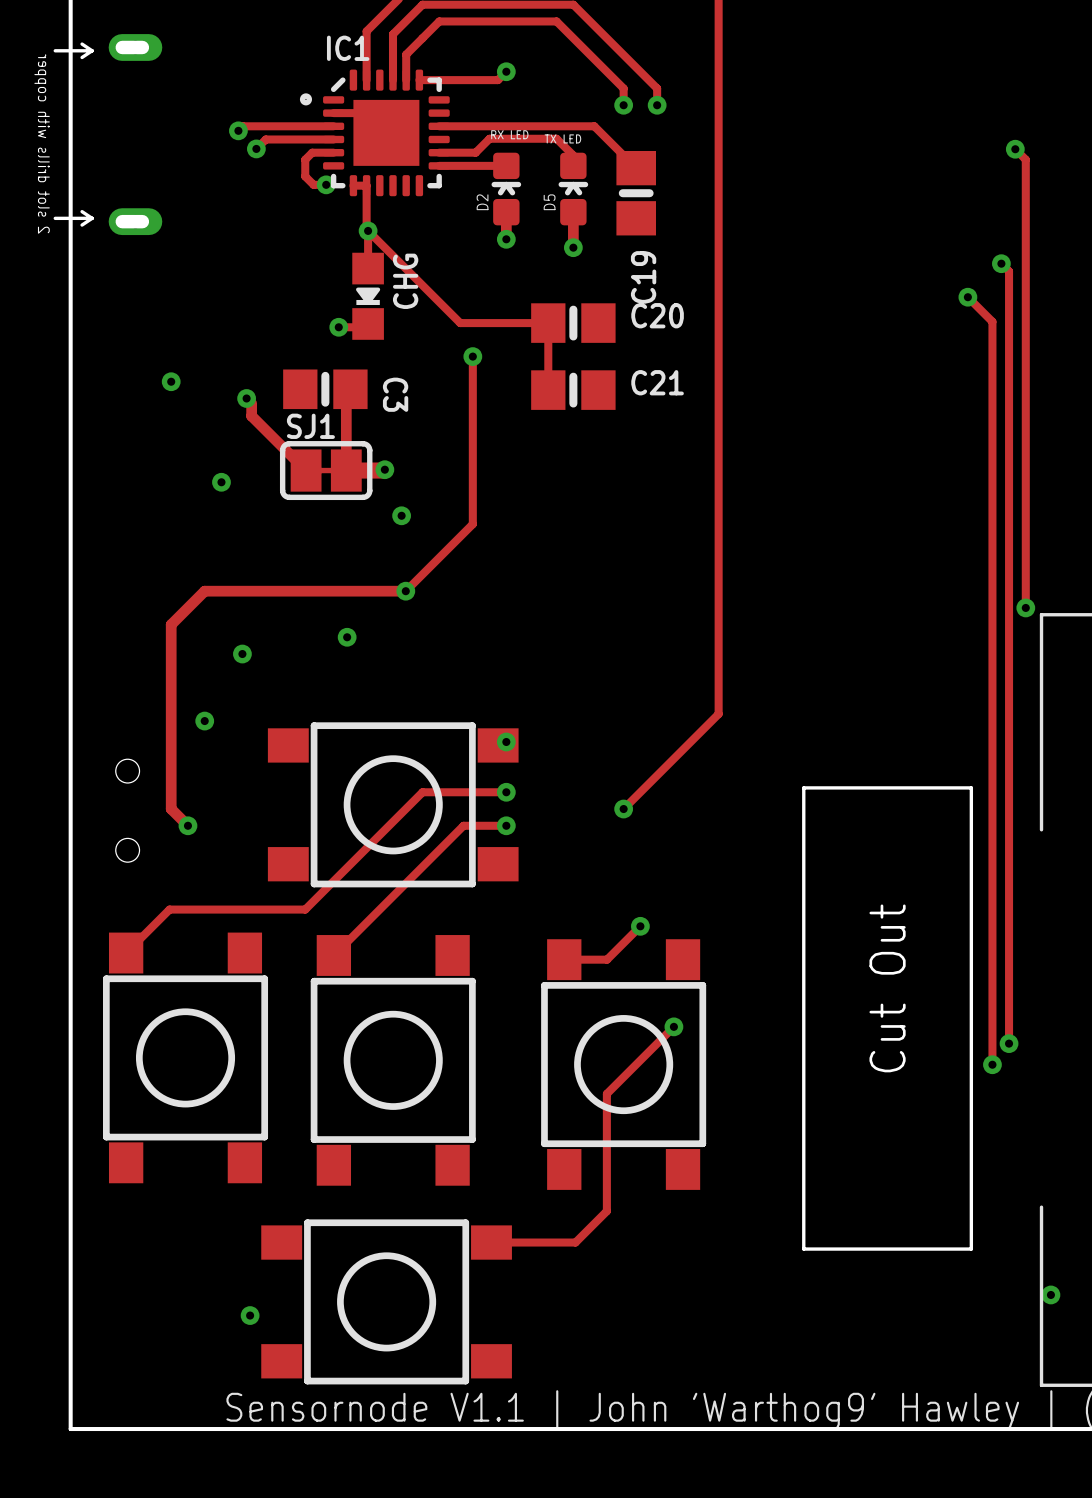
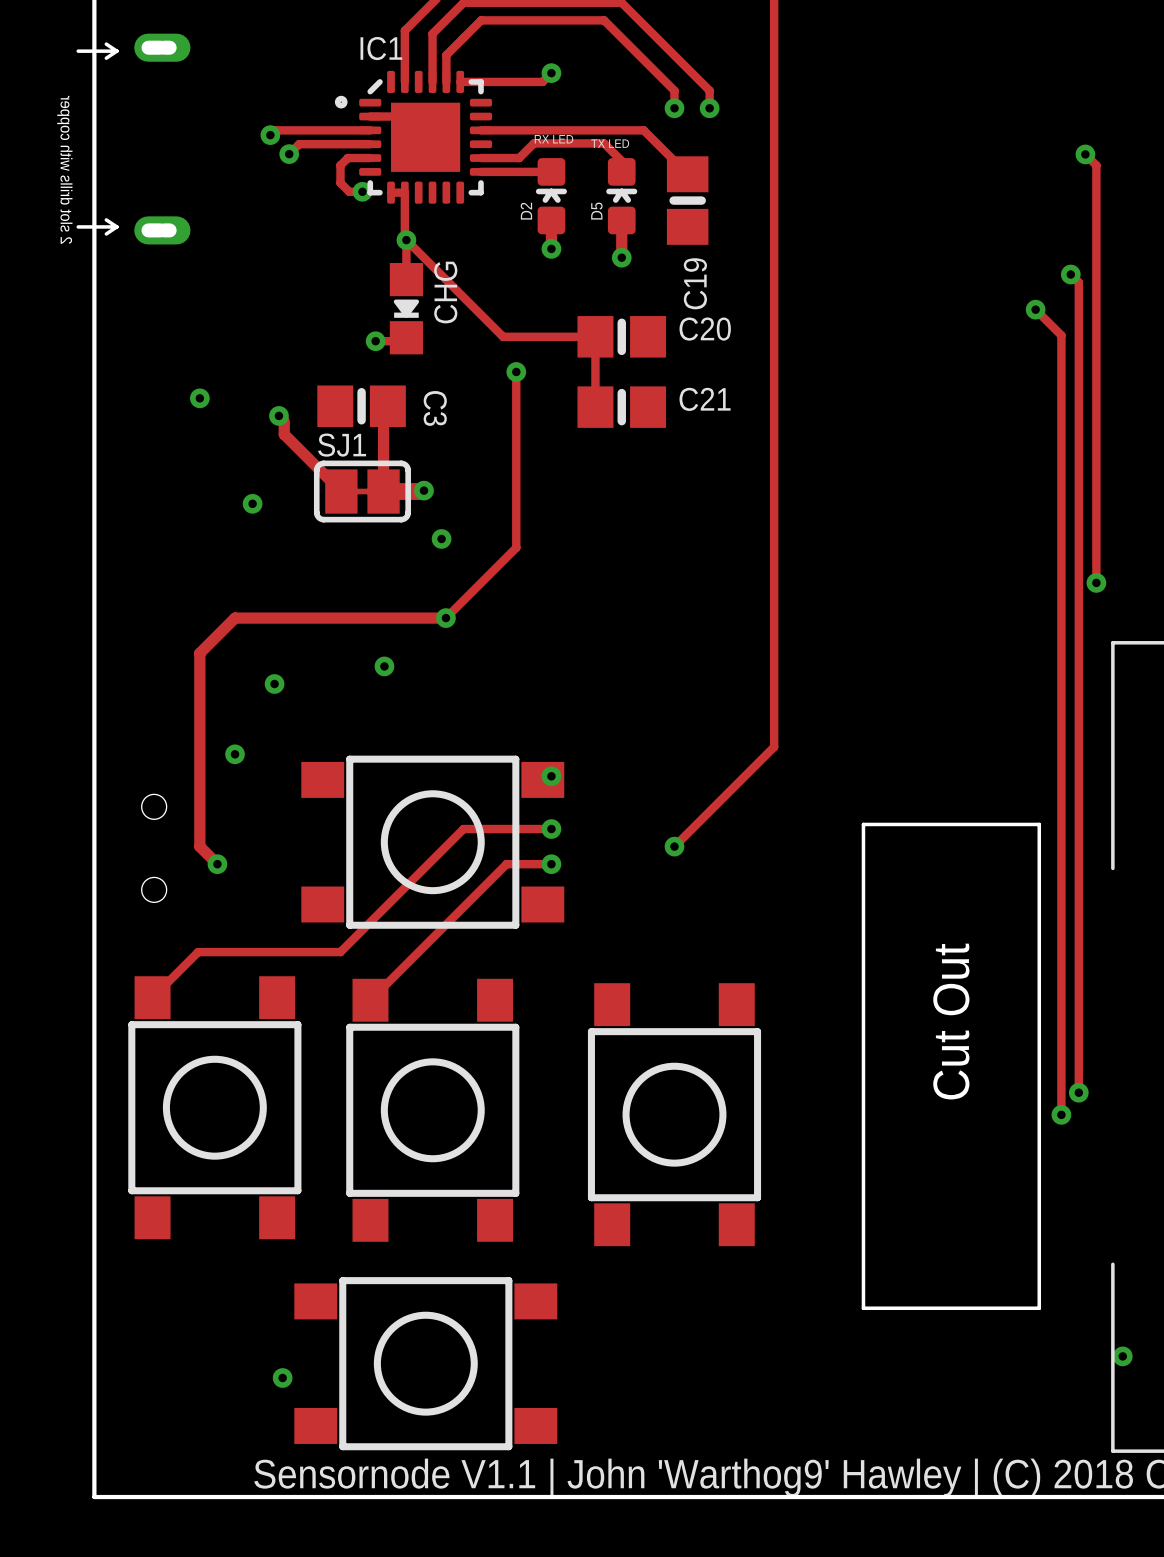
track: (1025, 557) (1025, 607) -> none
via position: (1025, 607) -> (1096, 582)
track: (640, 926) (607, 959) (564, 959) -> none
via: (640, 926) -> none
track: (673, 1026) (606, 1093) (606, 1211) (575, 1242) (491, 1242) -> none
via: (673, 1026) -> none

